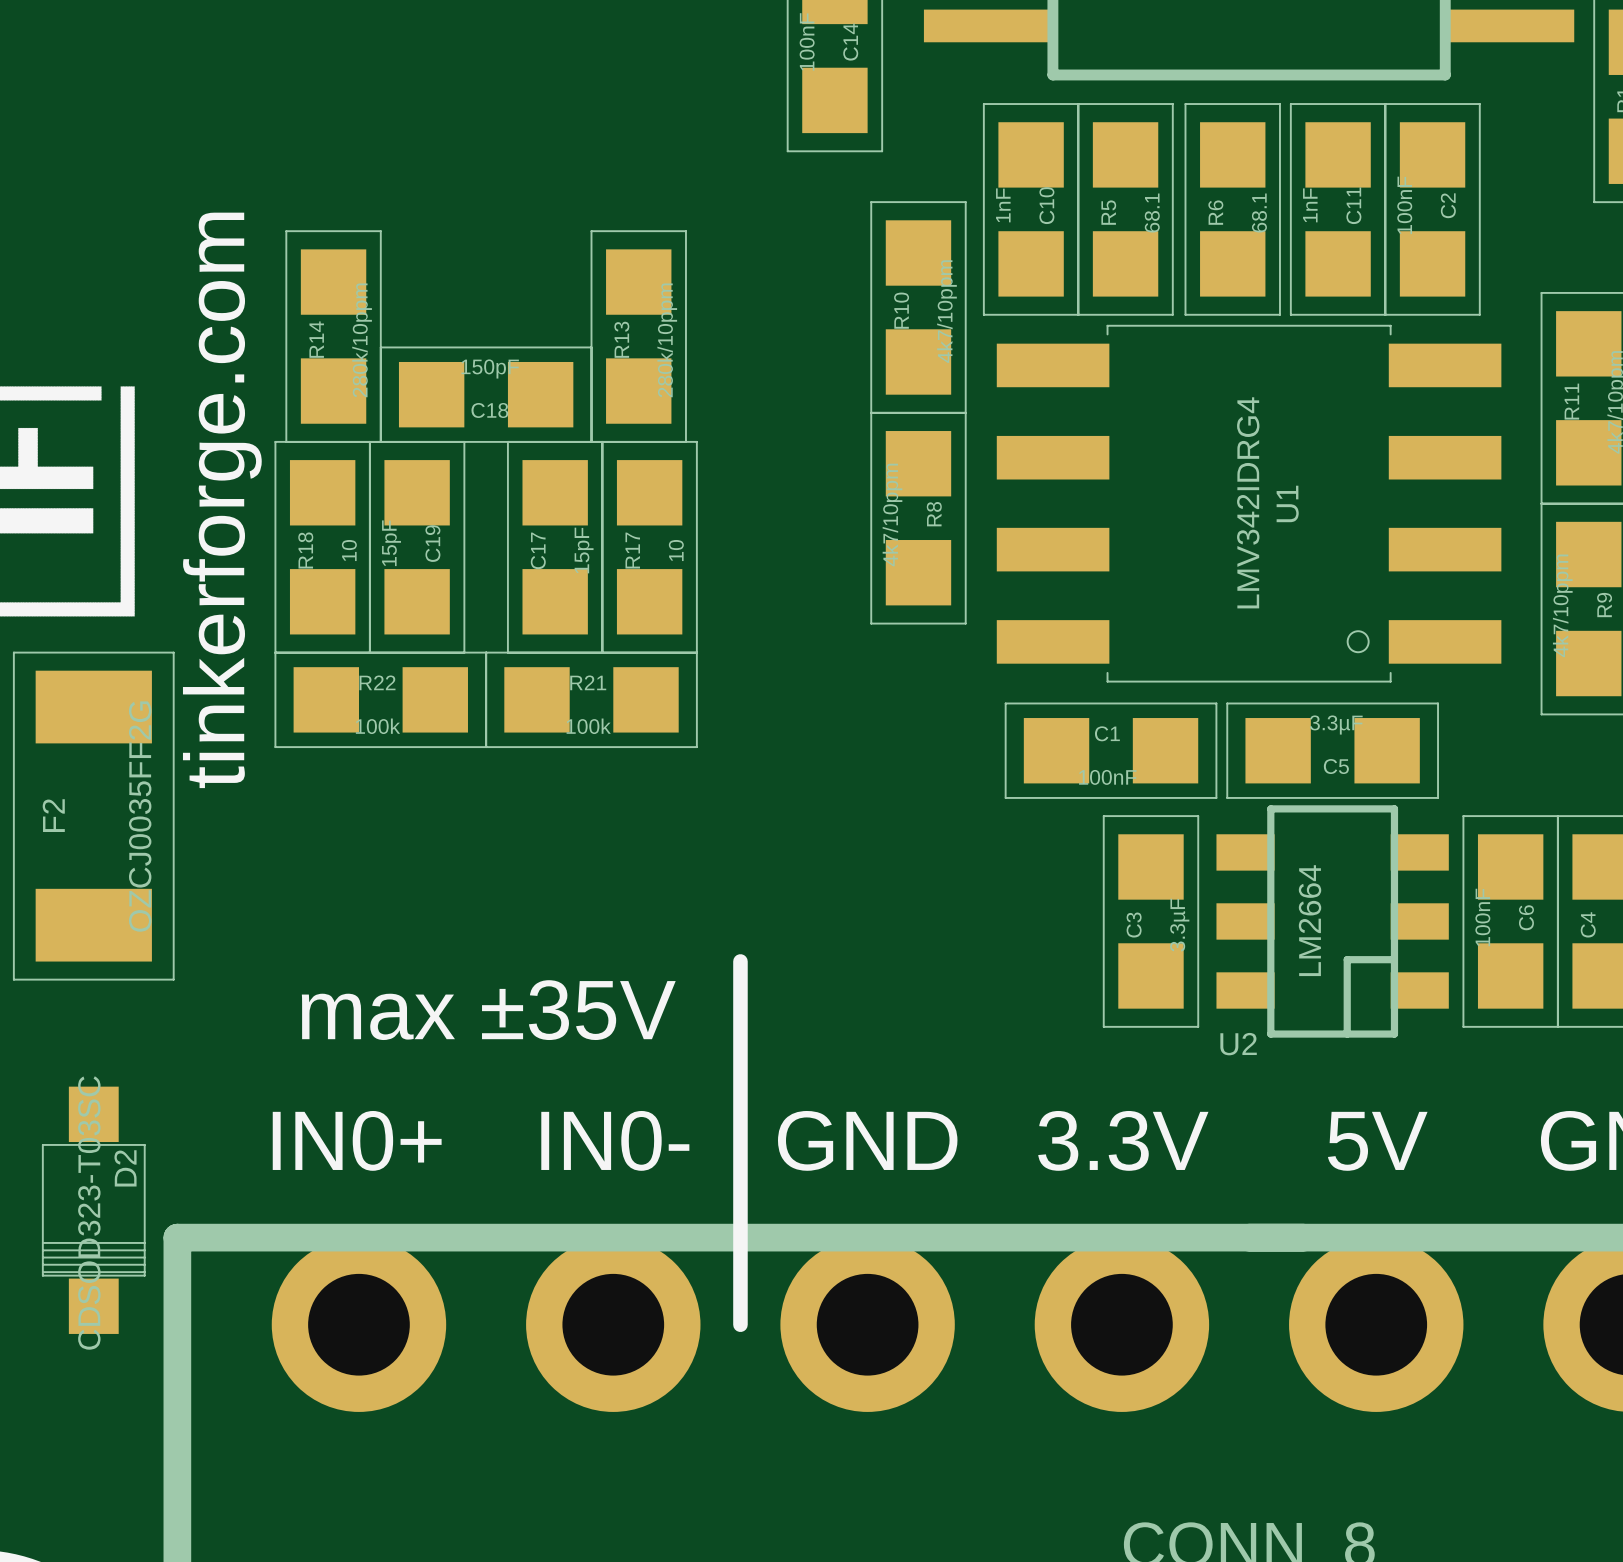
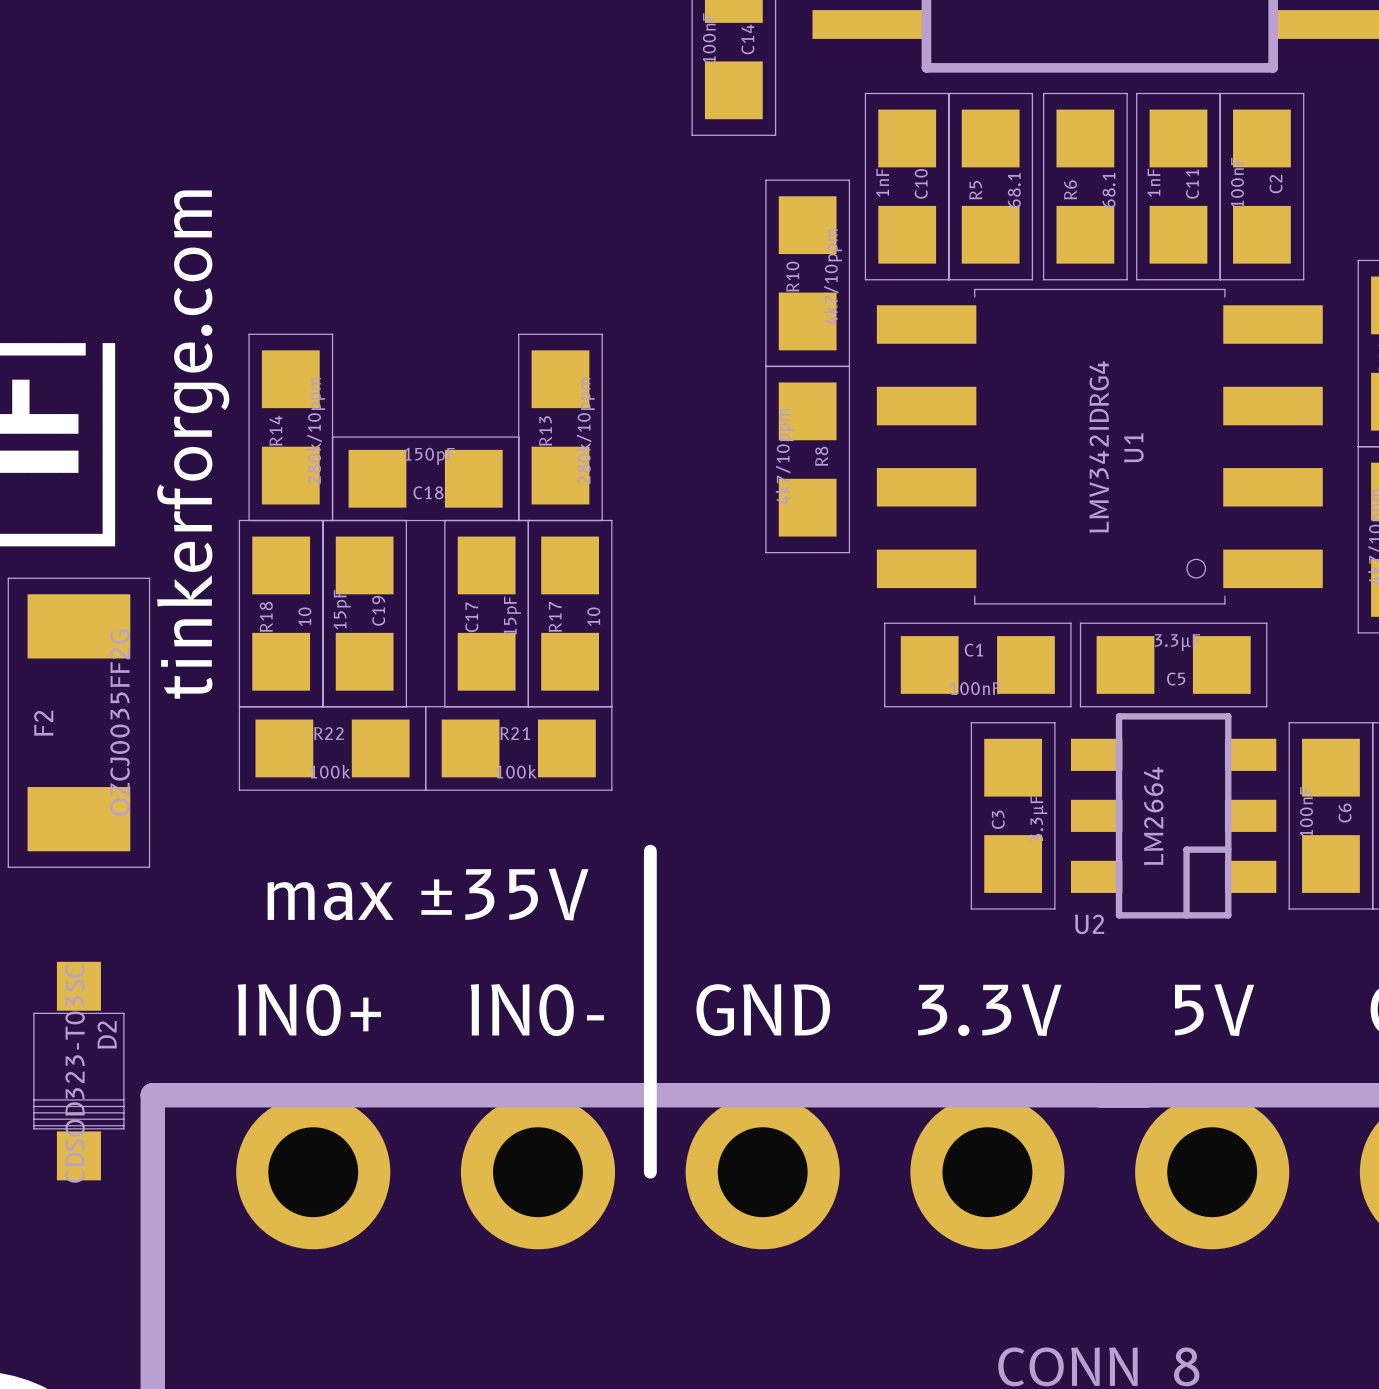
R14 position: (333, 336) -> (290, 427)
R13 position: (638, 336) -> (560, 427)
C18 position: (486, 394) -> (425, 478)
R18 position: (322, 547) -> (281, 613)
C19 position: (417, 547) -> (364, 613)
C17 position: (555, 547) -> (486, 613)
R17 position: (649, 547) -> (570, 613)
R22 position: (380, 699) -> (332, 748)
R21 position: (591, 699) -> (518, 748)

